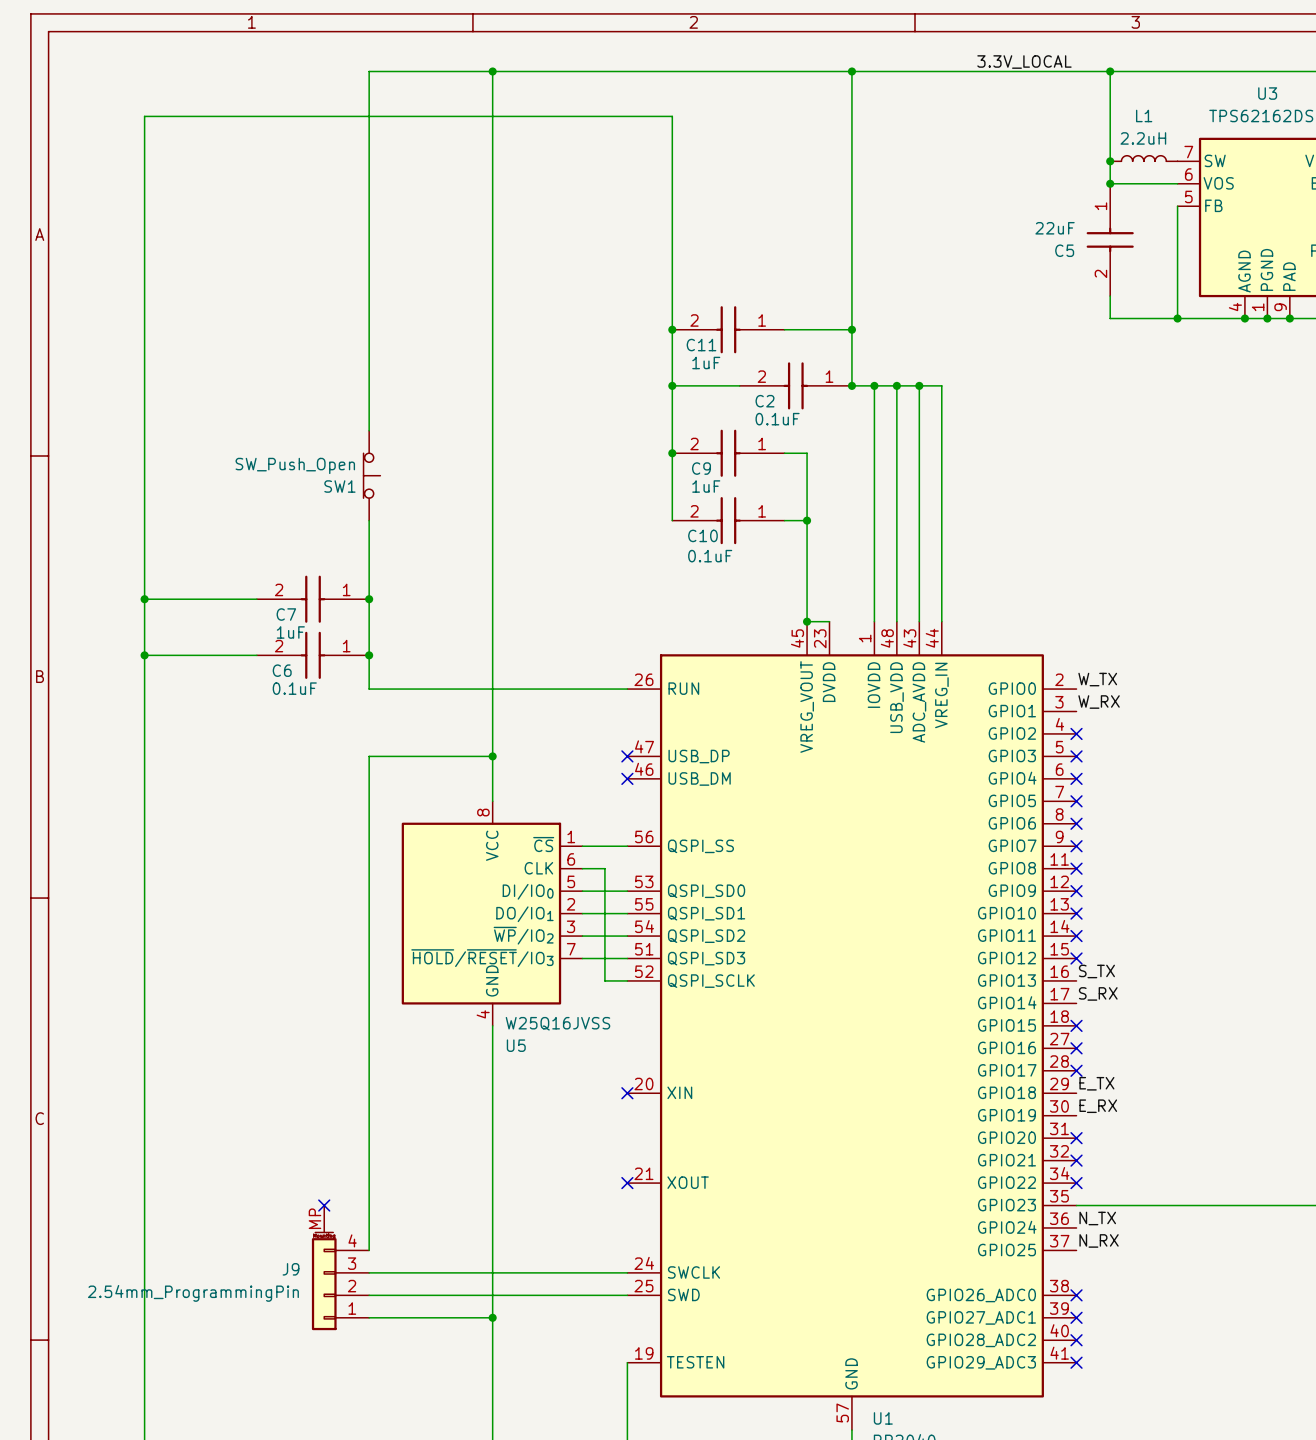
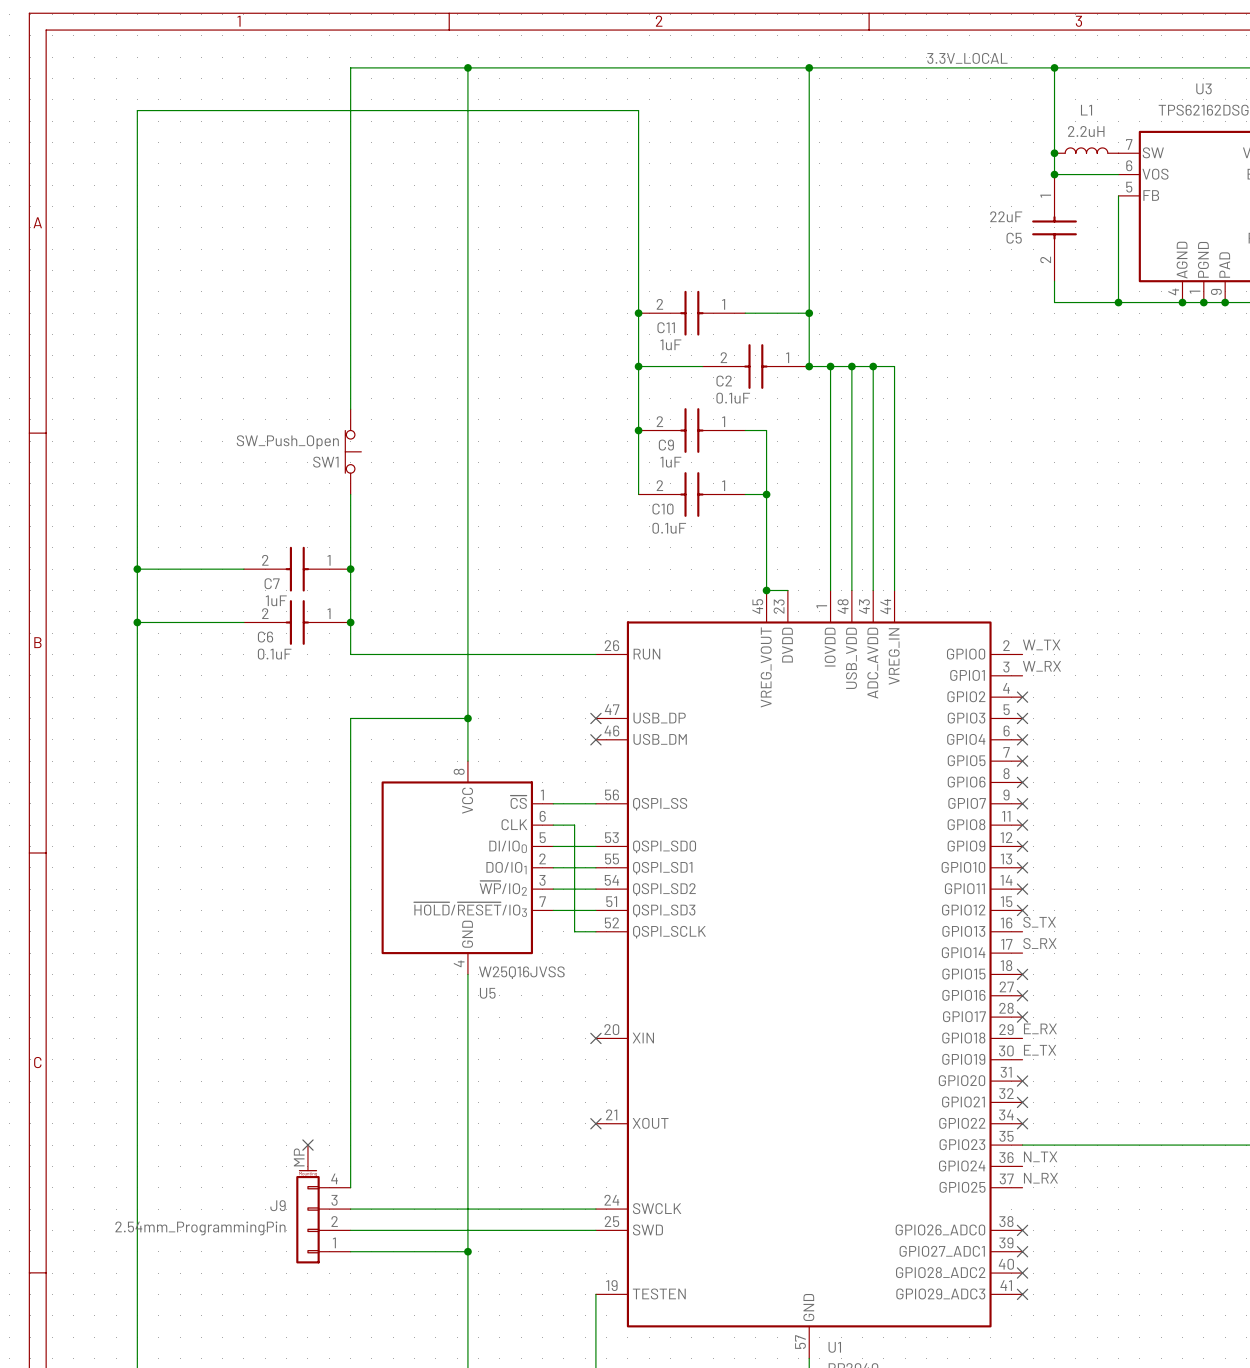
label: E_TX (1096, 1083) -> E_RX (1040, 1028)
label: E_RX (1098, 1106) -> E_TX (1040, 1050)

